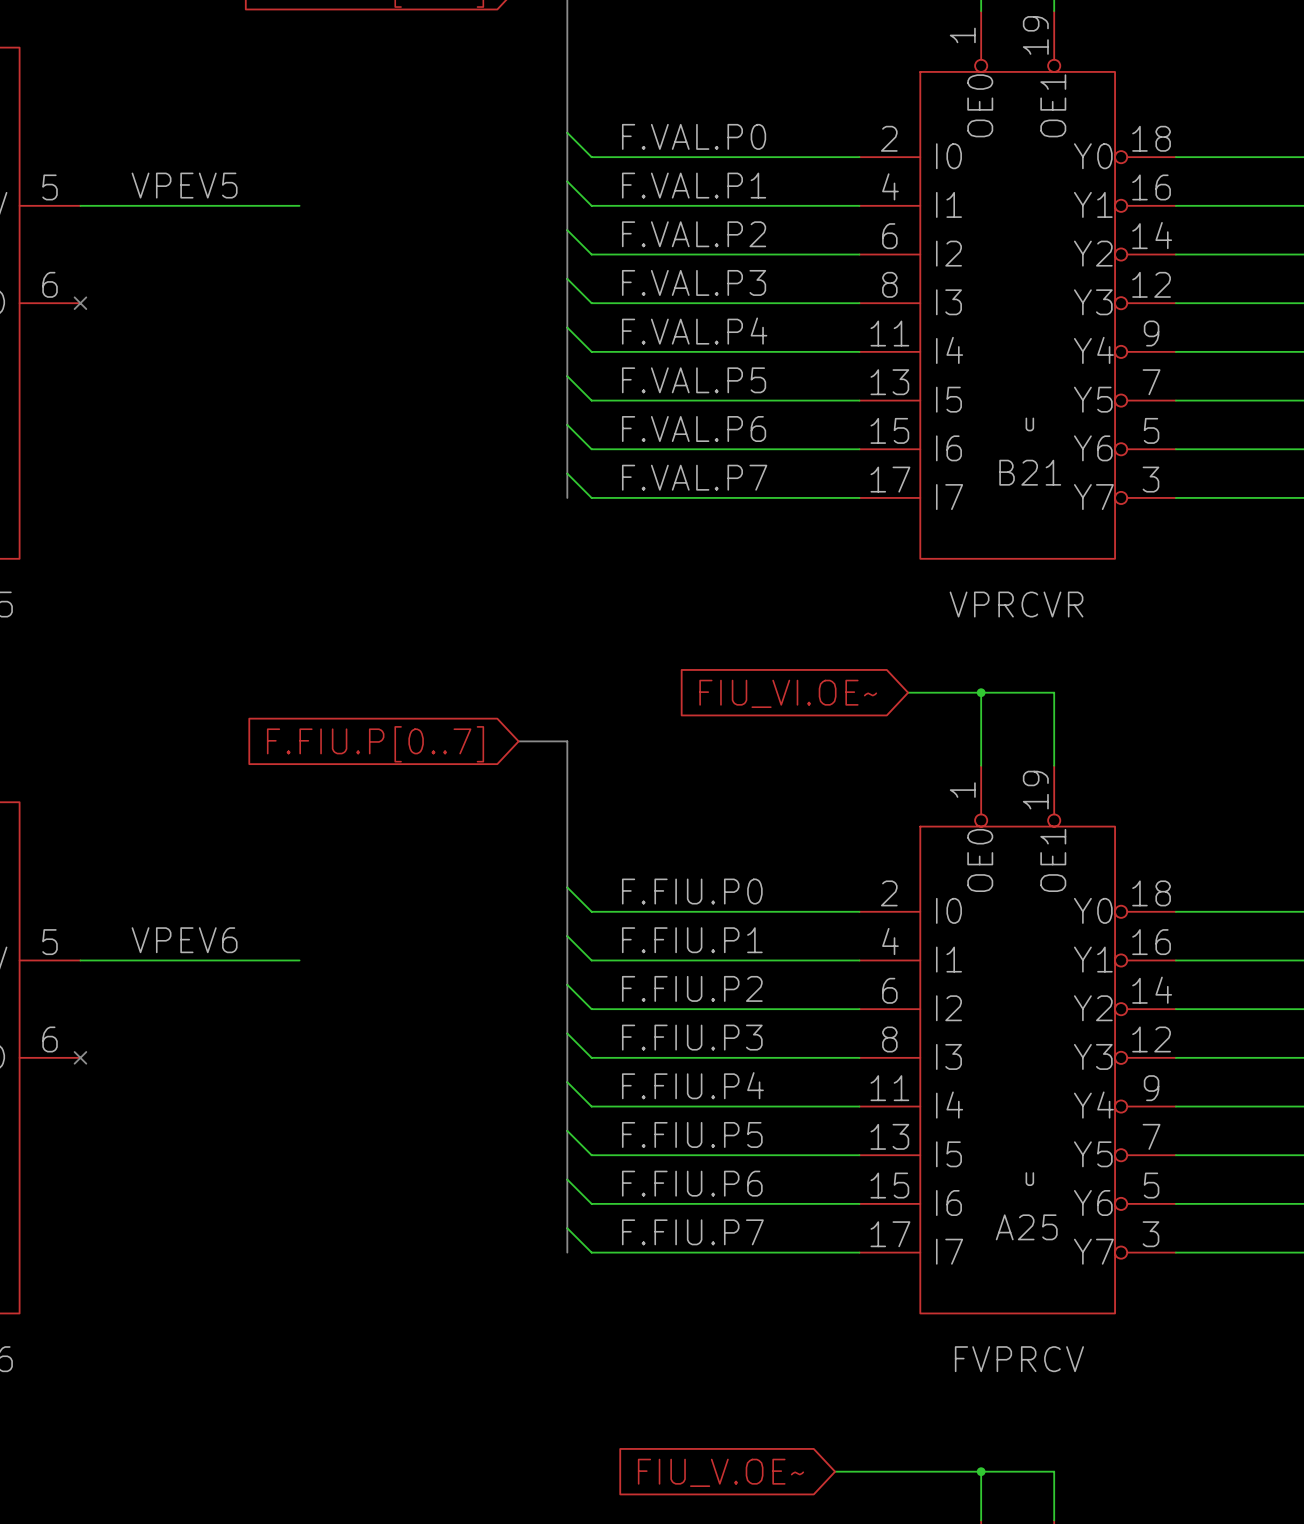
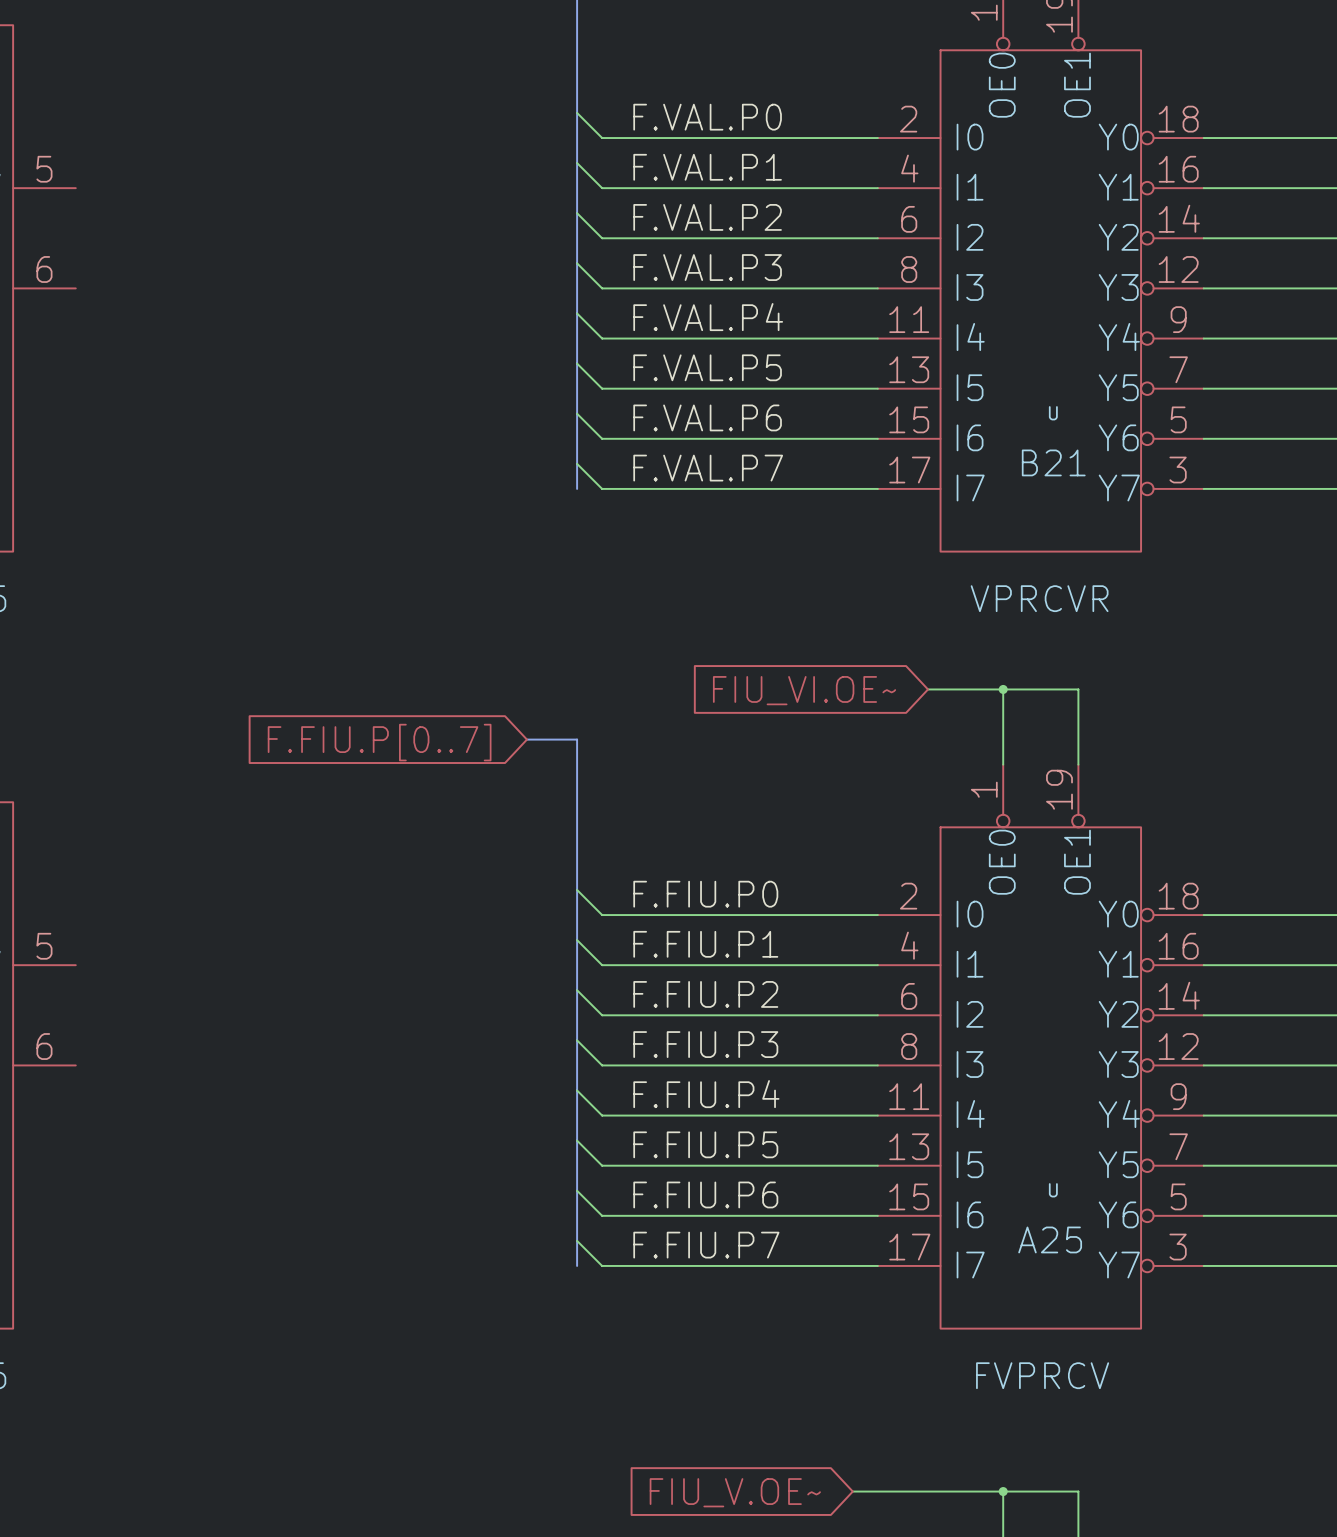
label: VPEV5 (184, 185) -> none
wire: (80, 205) (299, 205) -> none
no-connect mark: (80, 303) -> none
label: VPEV6 (184, 940) -> none
wire: (80, 960) (299, 960) -> none
no-connect mark: (80, 1057) -> none

